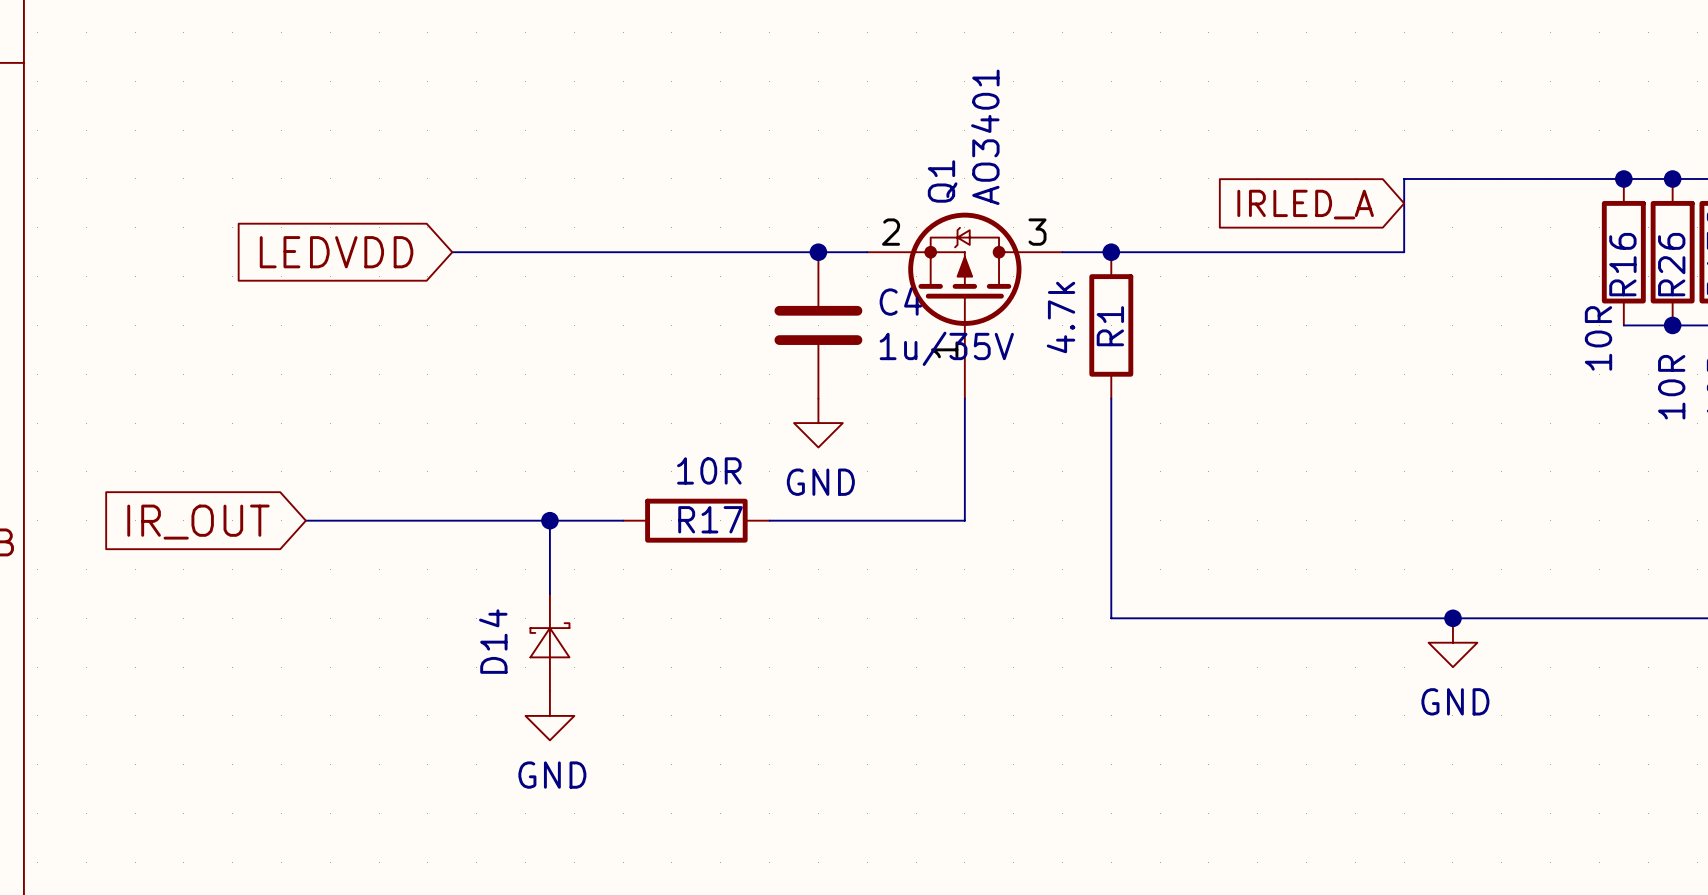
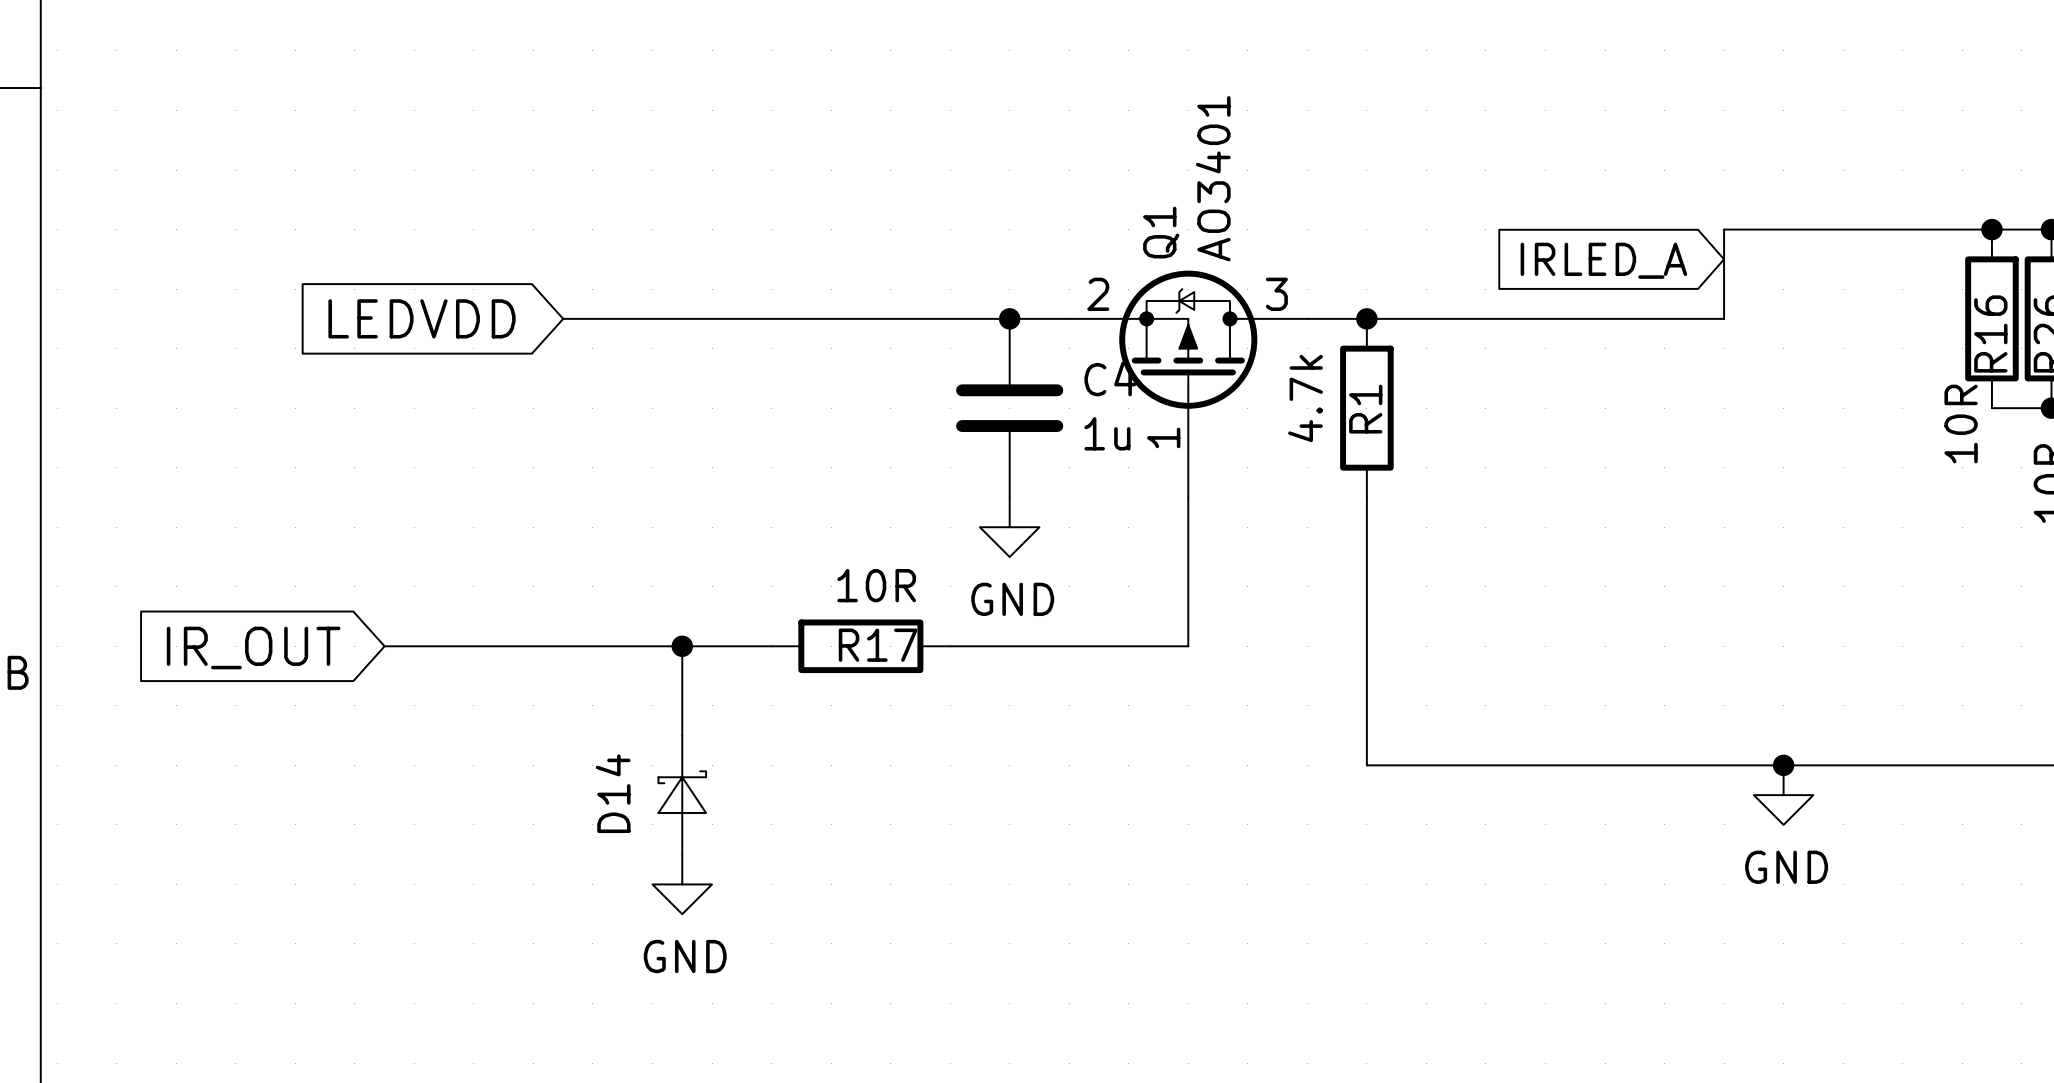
C4 value: 1u/35V (946, 348) -> 1u (1107, 433)

